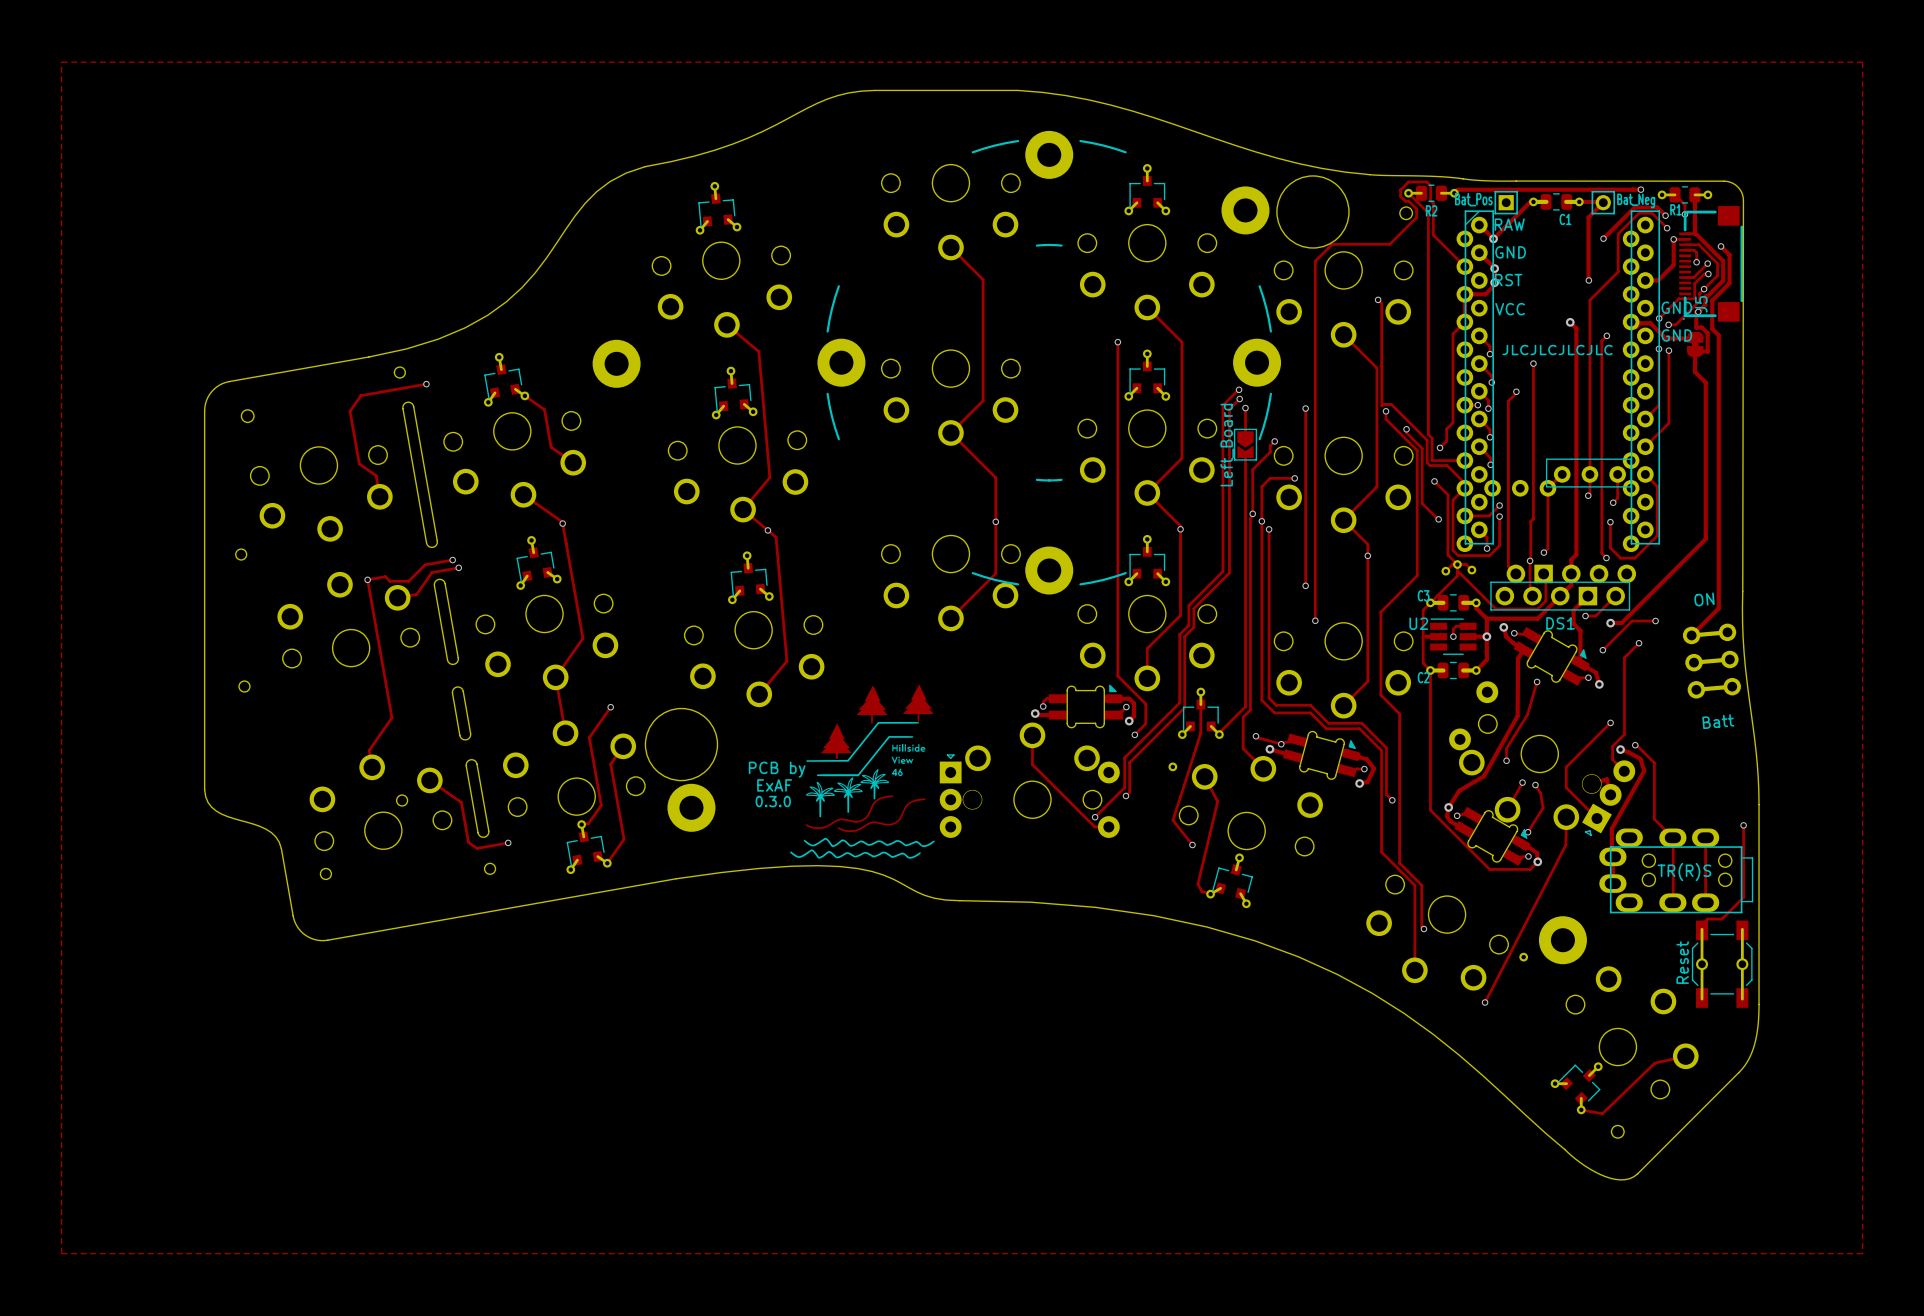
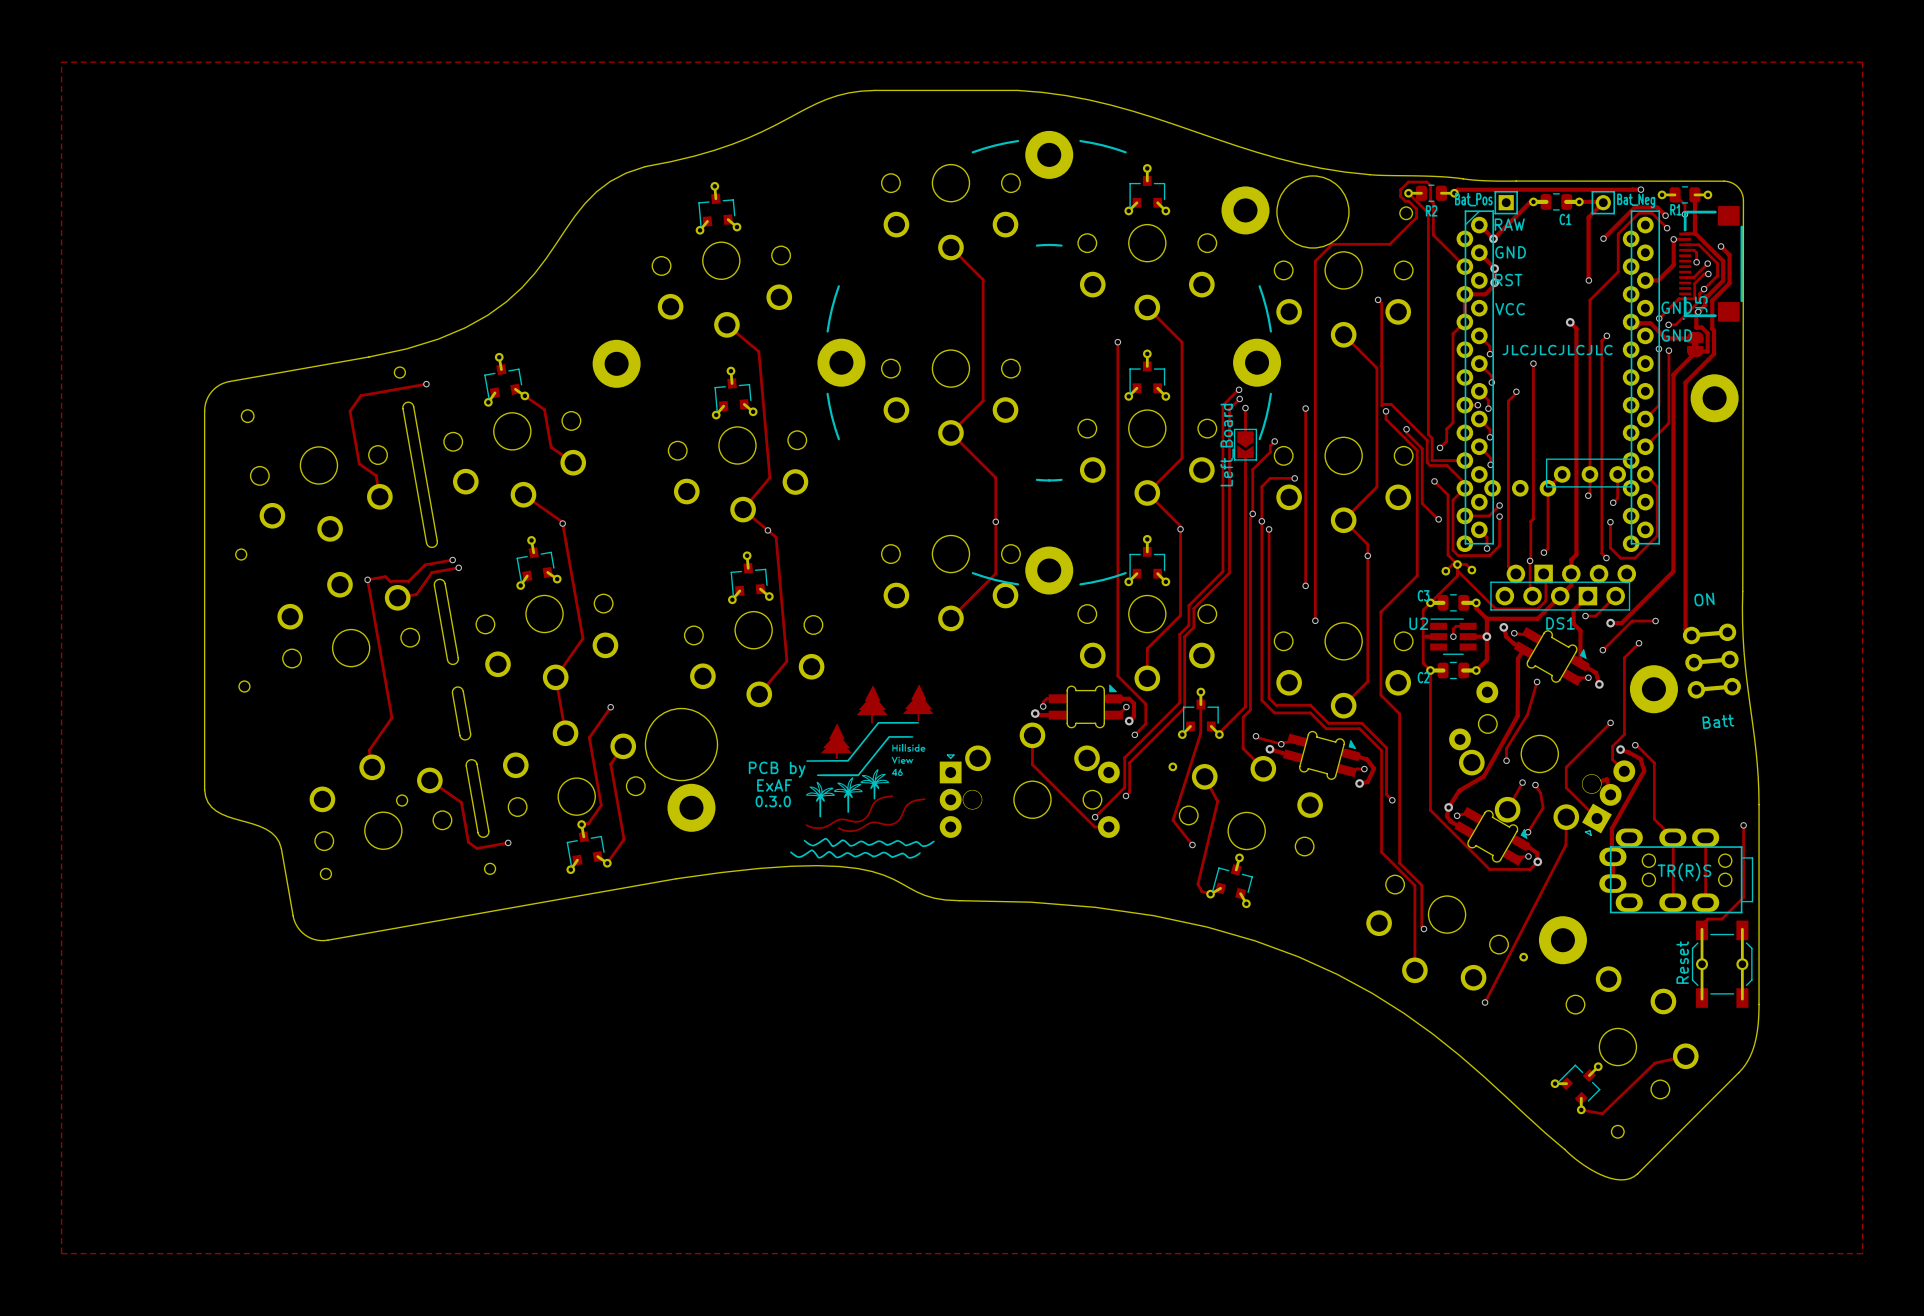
track: (1714, 330) (1718, 335) (1718, 608) (1691, 635) -> (1714, 330) (1714, 354) (1685, 382) (1685, 629) (1691, 635)
track: (1694, 353) (1694, 371) (1705, 382) (1705, 539) (1673, 571) -> (1694, 353) (1673, 374) (1673, 571)
part: none -> (1714, 398)
part: none -> (1653, 689)

